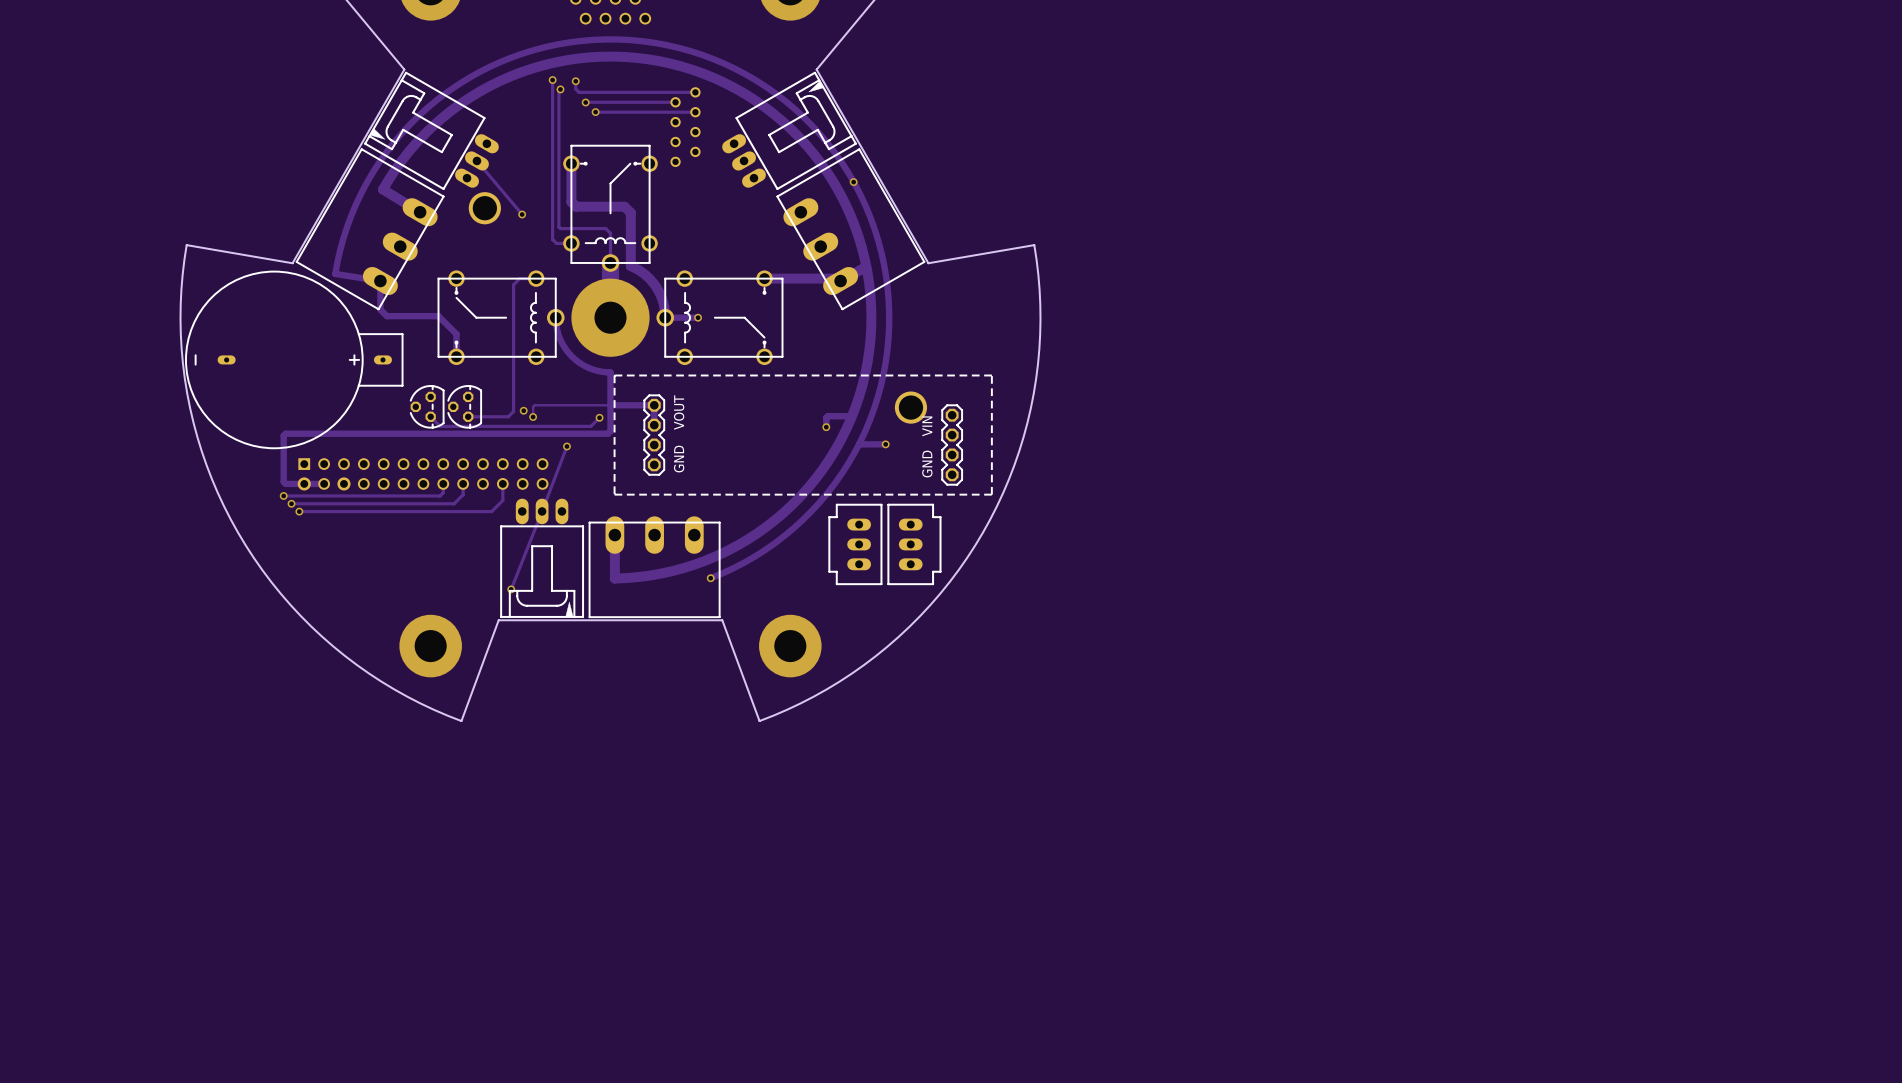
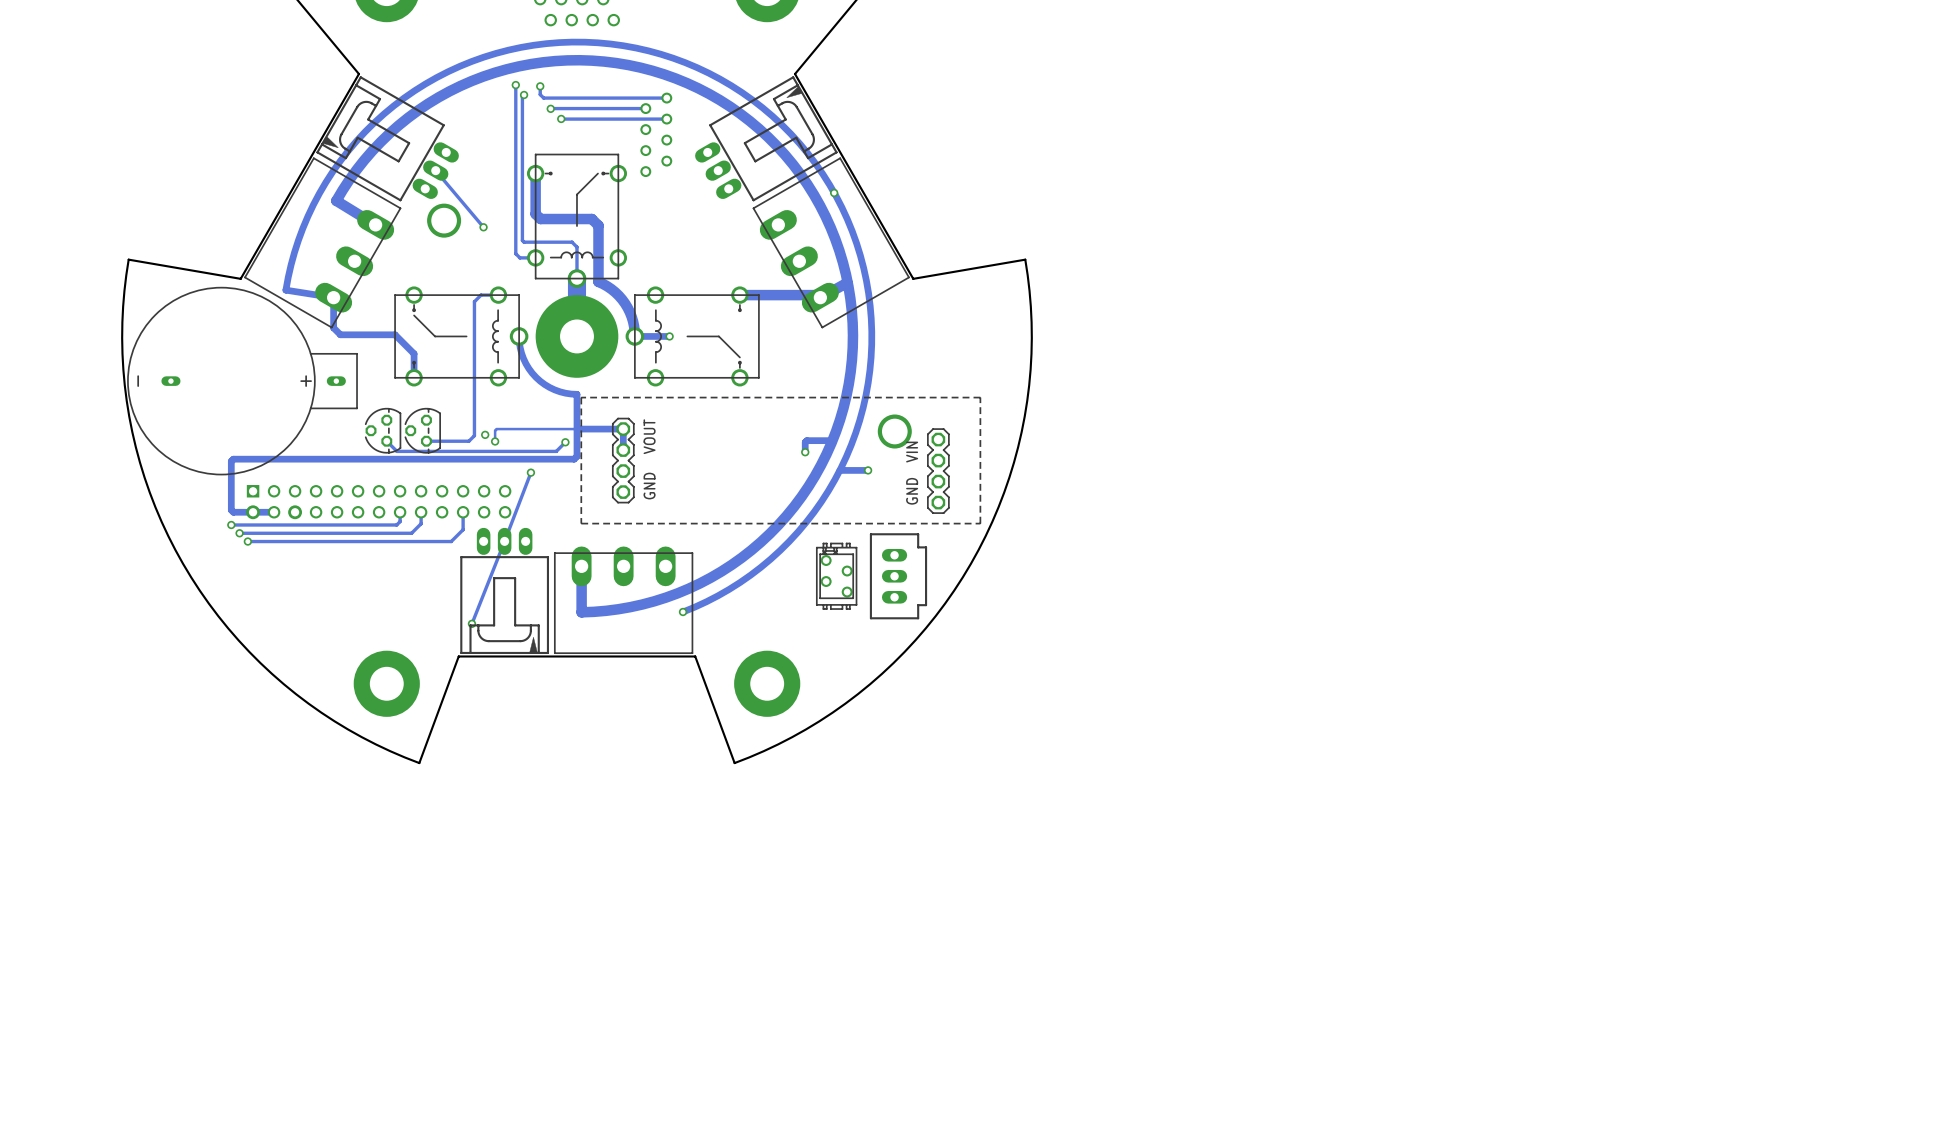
part footprint: [828, 503, 883, 586] -> [815, 542, 858, 610]

